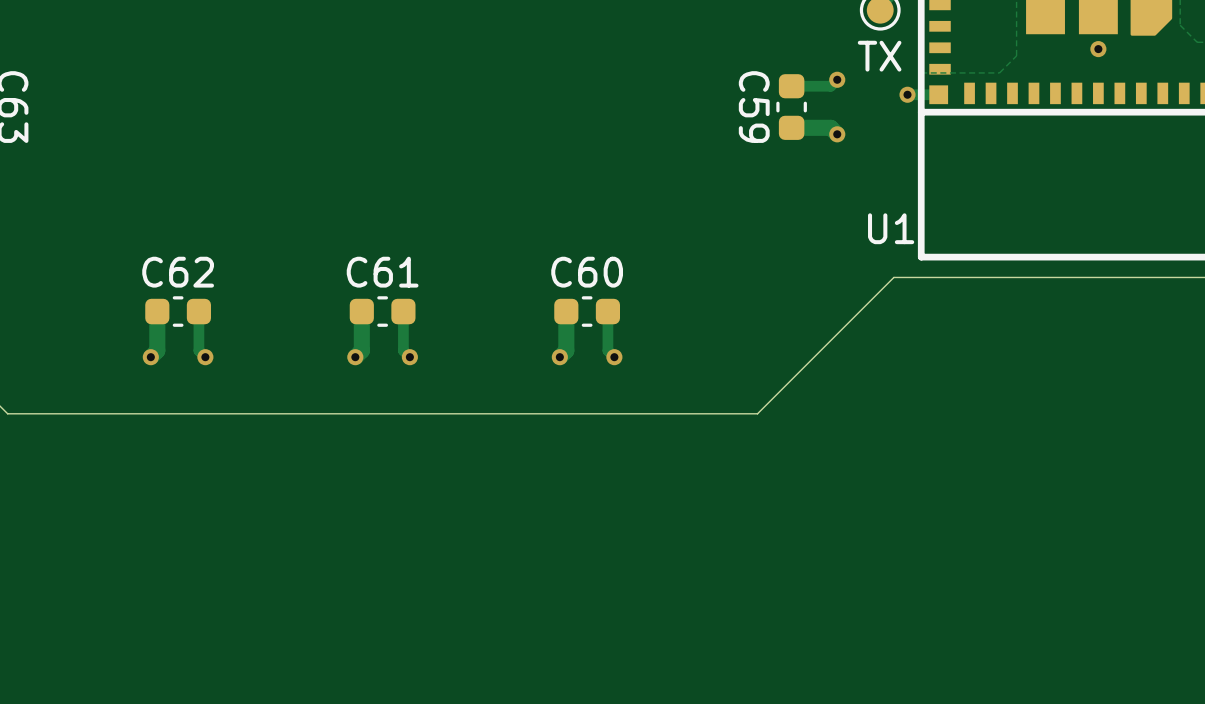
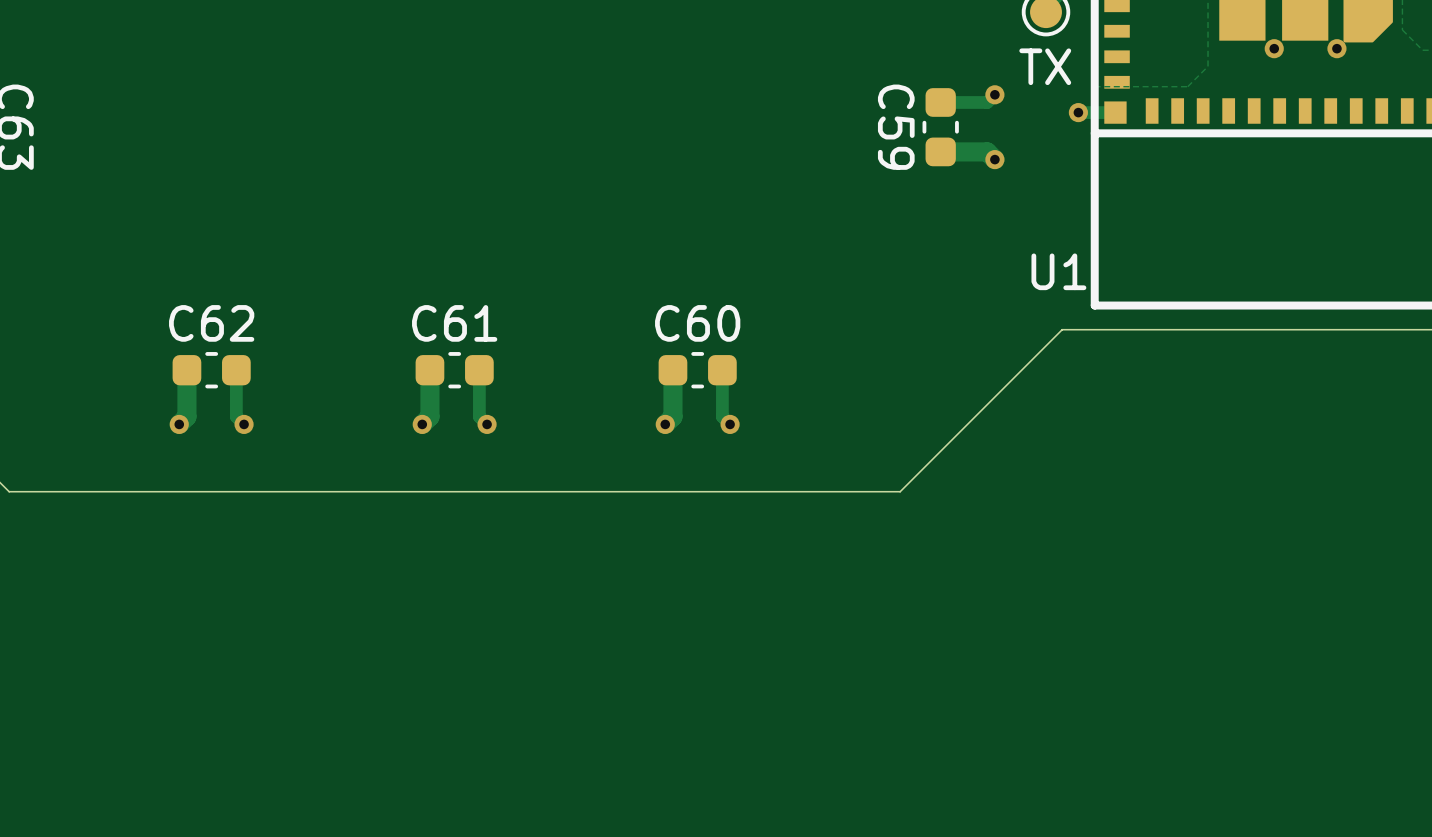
via: none -> (1274, 48)
via: none -> (1336, 48)
via: (1098, 49) -> none

